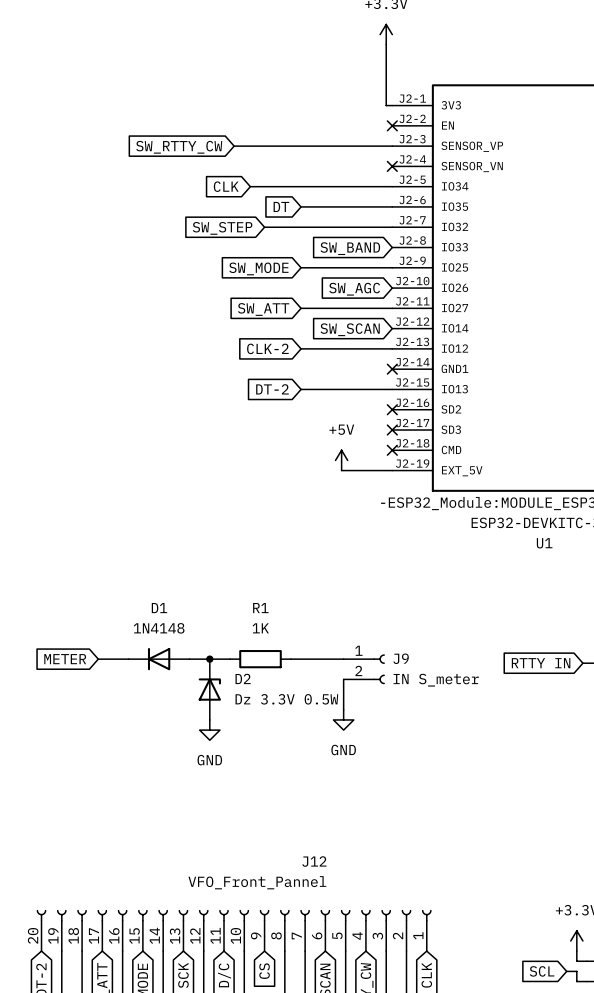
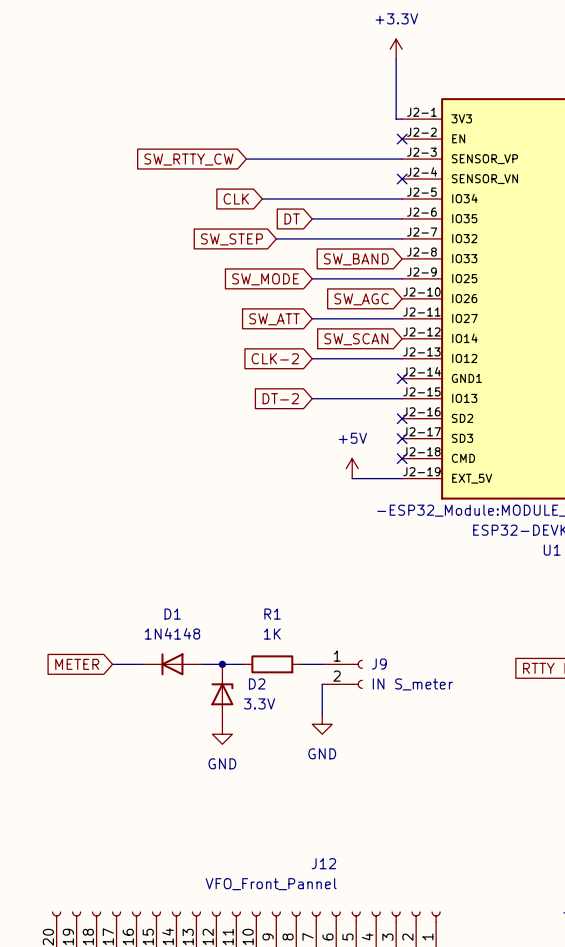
J9 position: (364, 669) -> (342, 674)
wire: (343, 679) (343, 709) -> (322, 684) (322, 714)
D2 value: Dz 3.3V 0.5W (286, 699) -> 3.3V (259, 703)
power symbol position: GND (343, 719) -> GND (322, 724)

